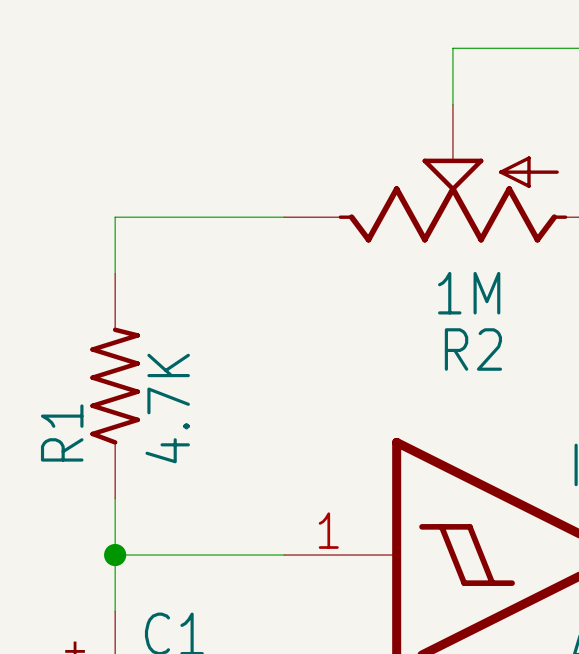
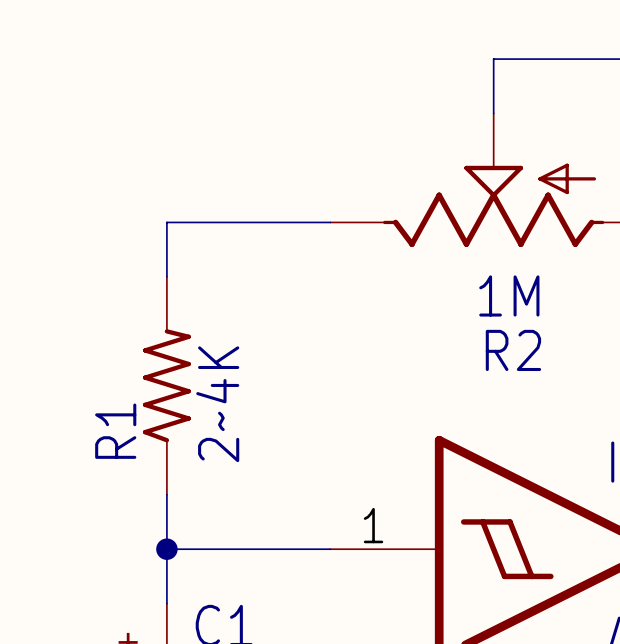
R1 value: 4.7K (167, 408) -> 2~4K (217, 404)

